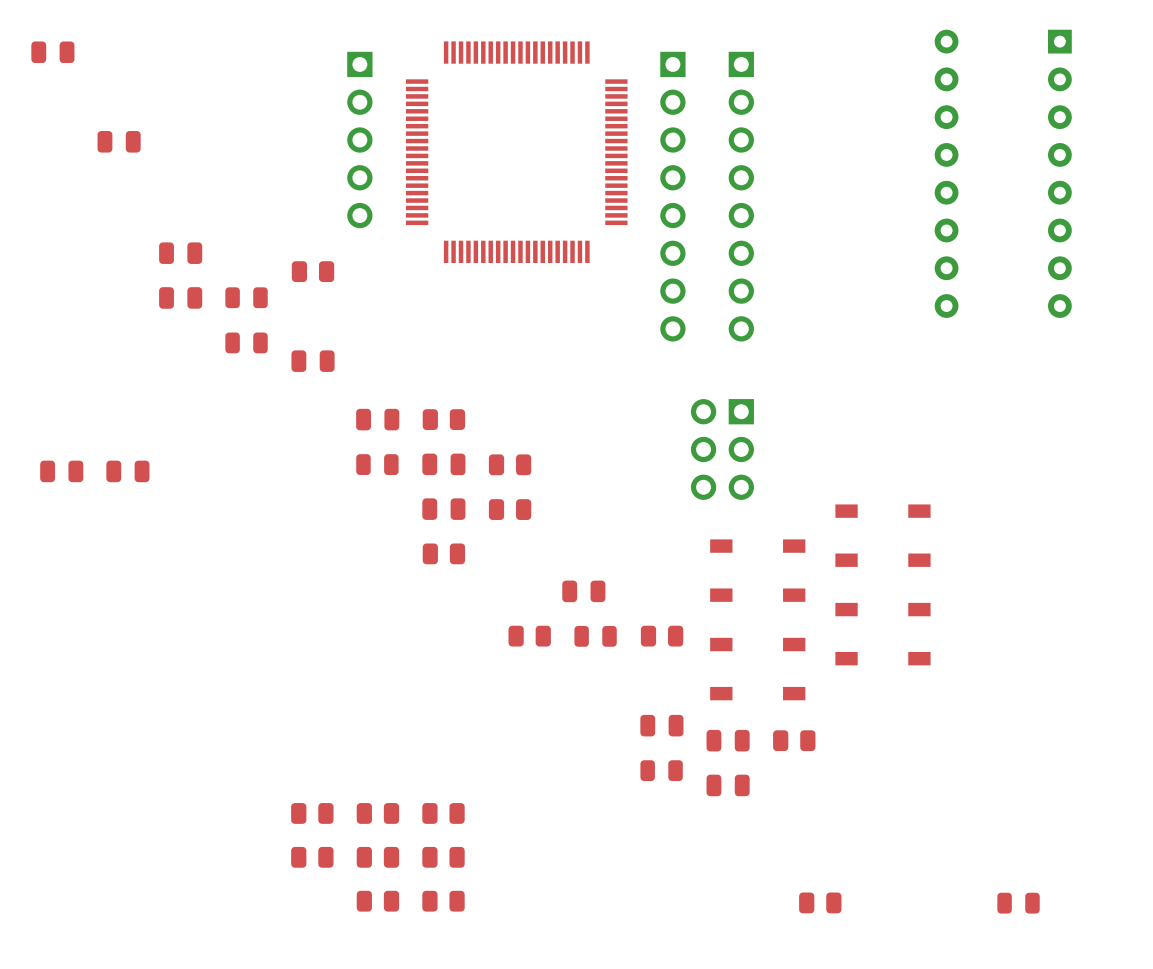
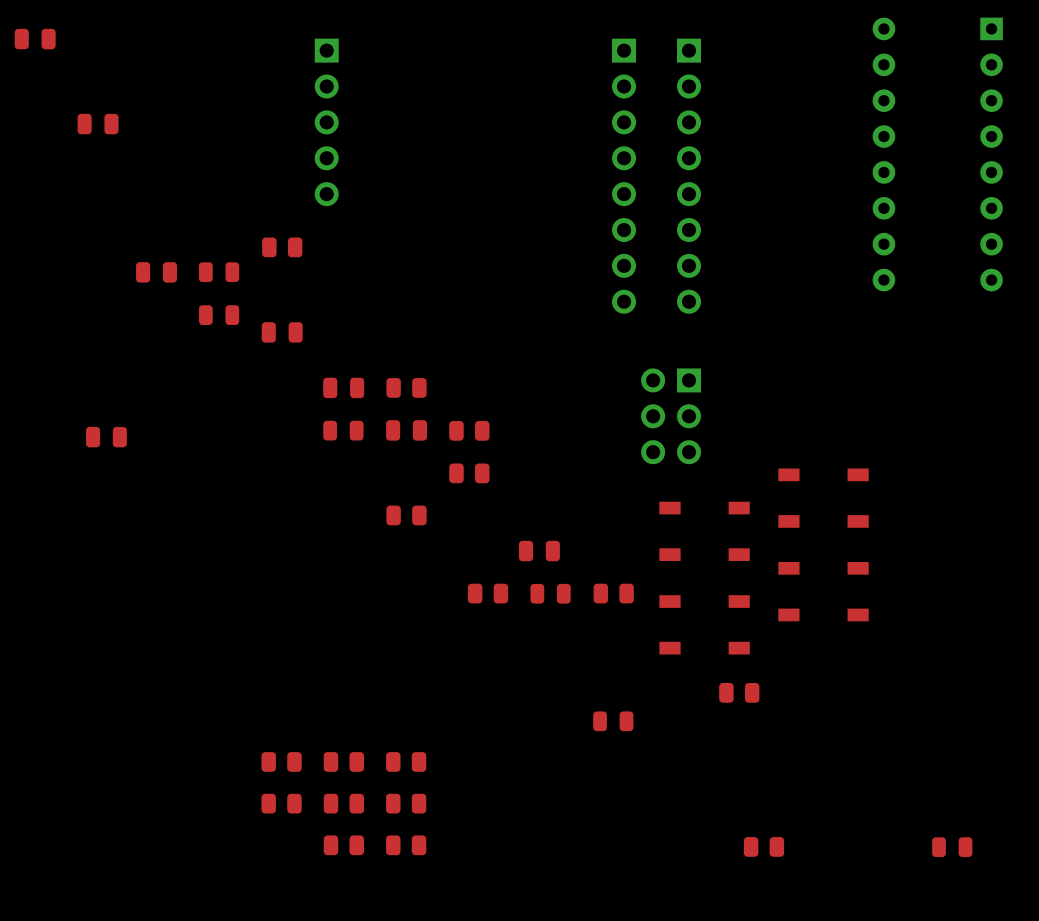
part: (516, 152) -> none
part: (180, 253) -> none
part: (61, 471) -> none
part: (443, 509) -> none
part: (661, 725) -> none
part: (728, 740) -> none
part: (728, 785) -> none

